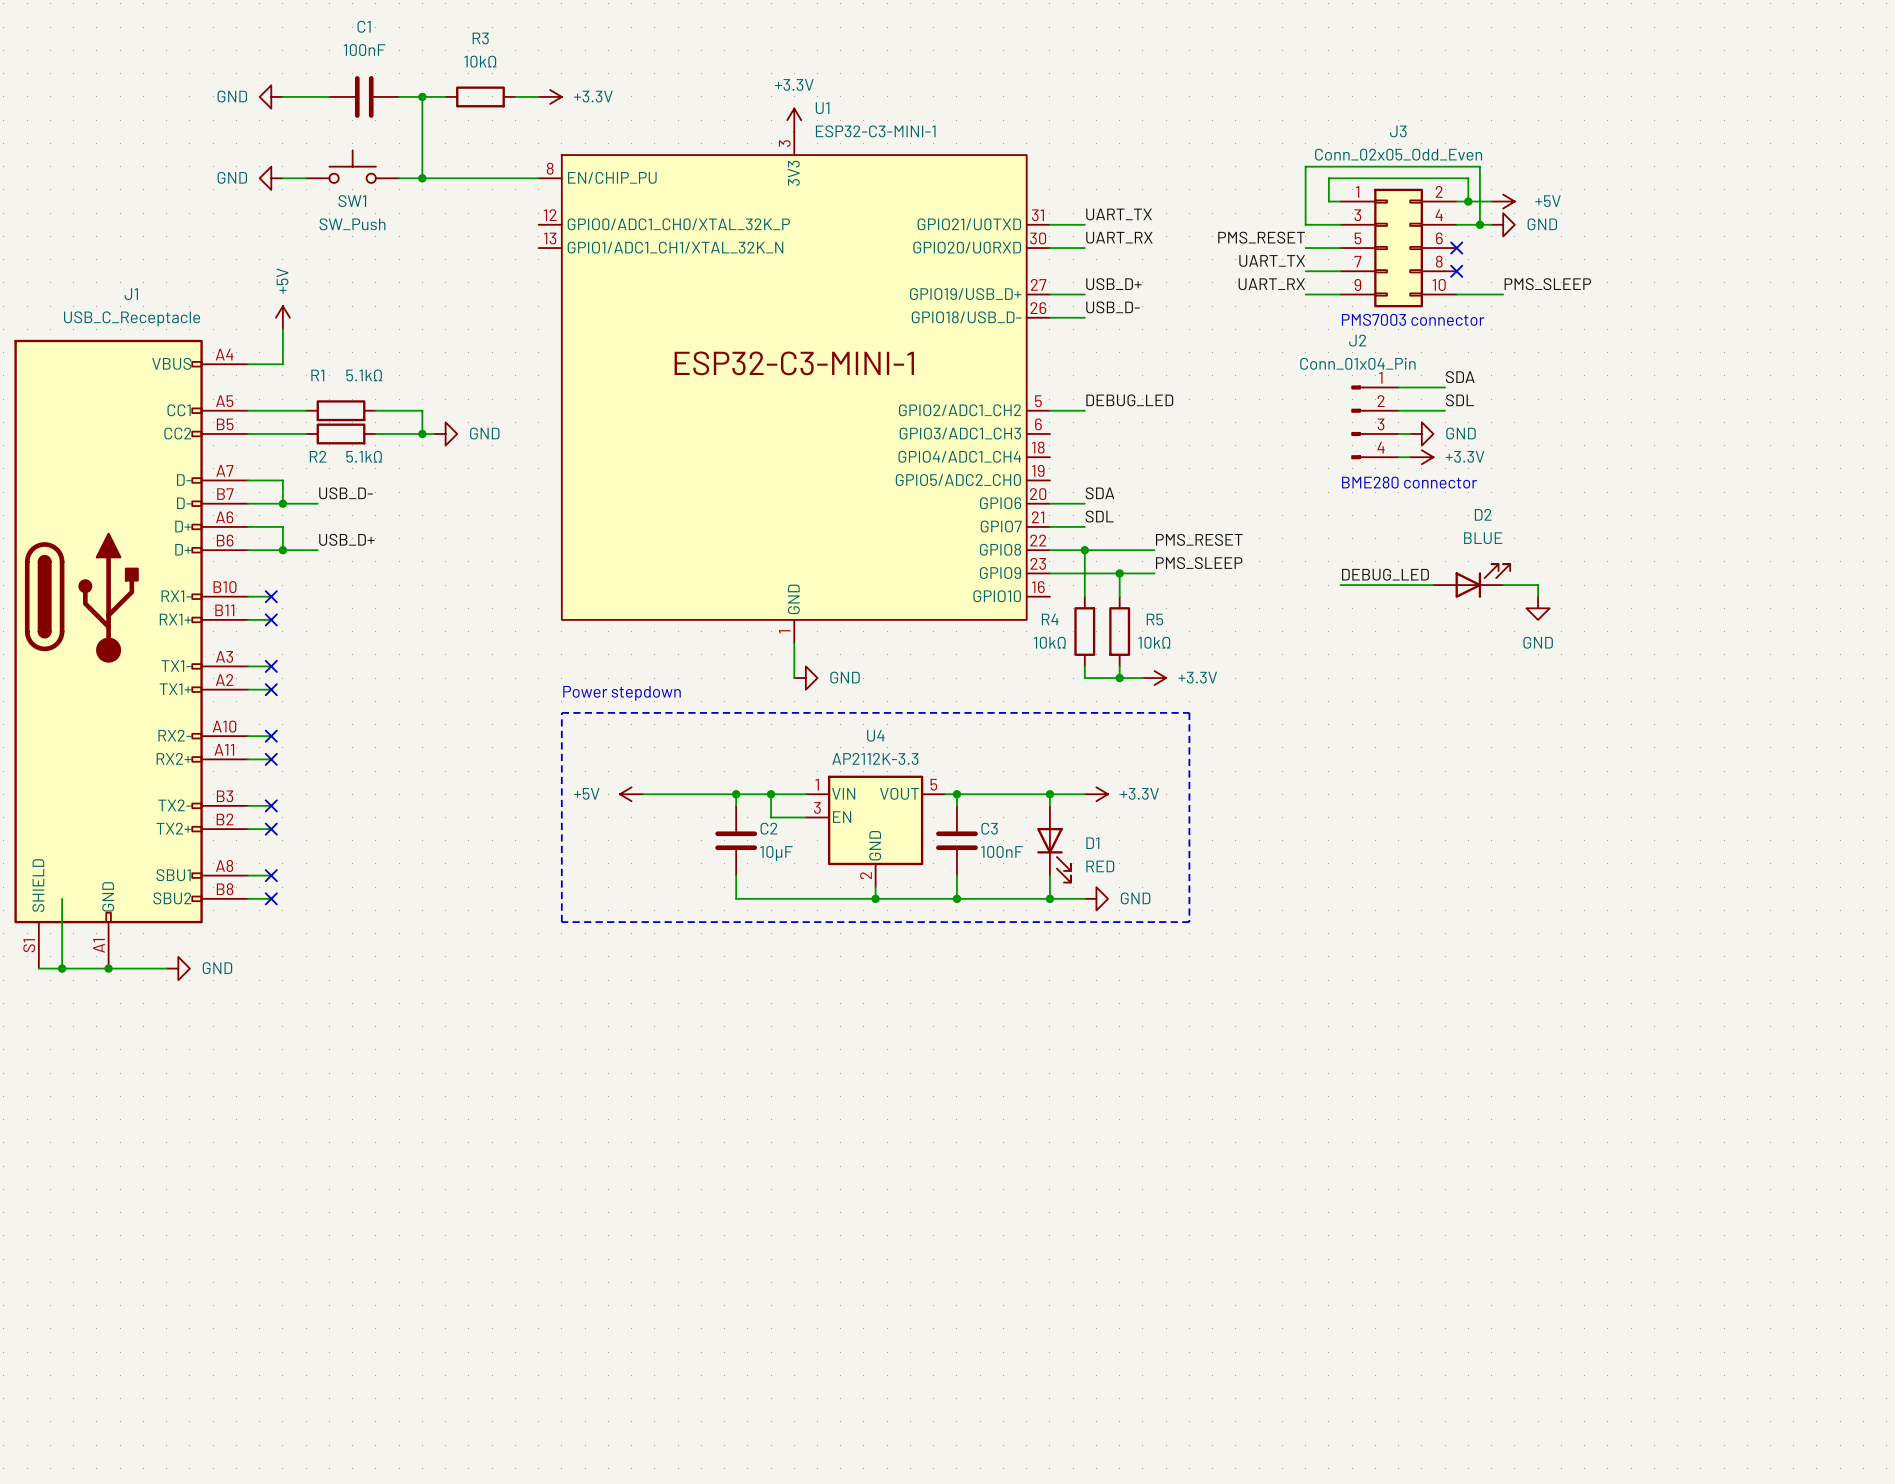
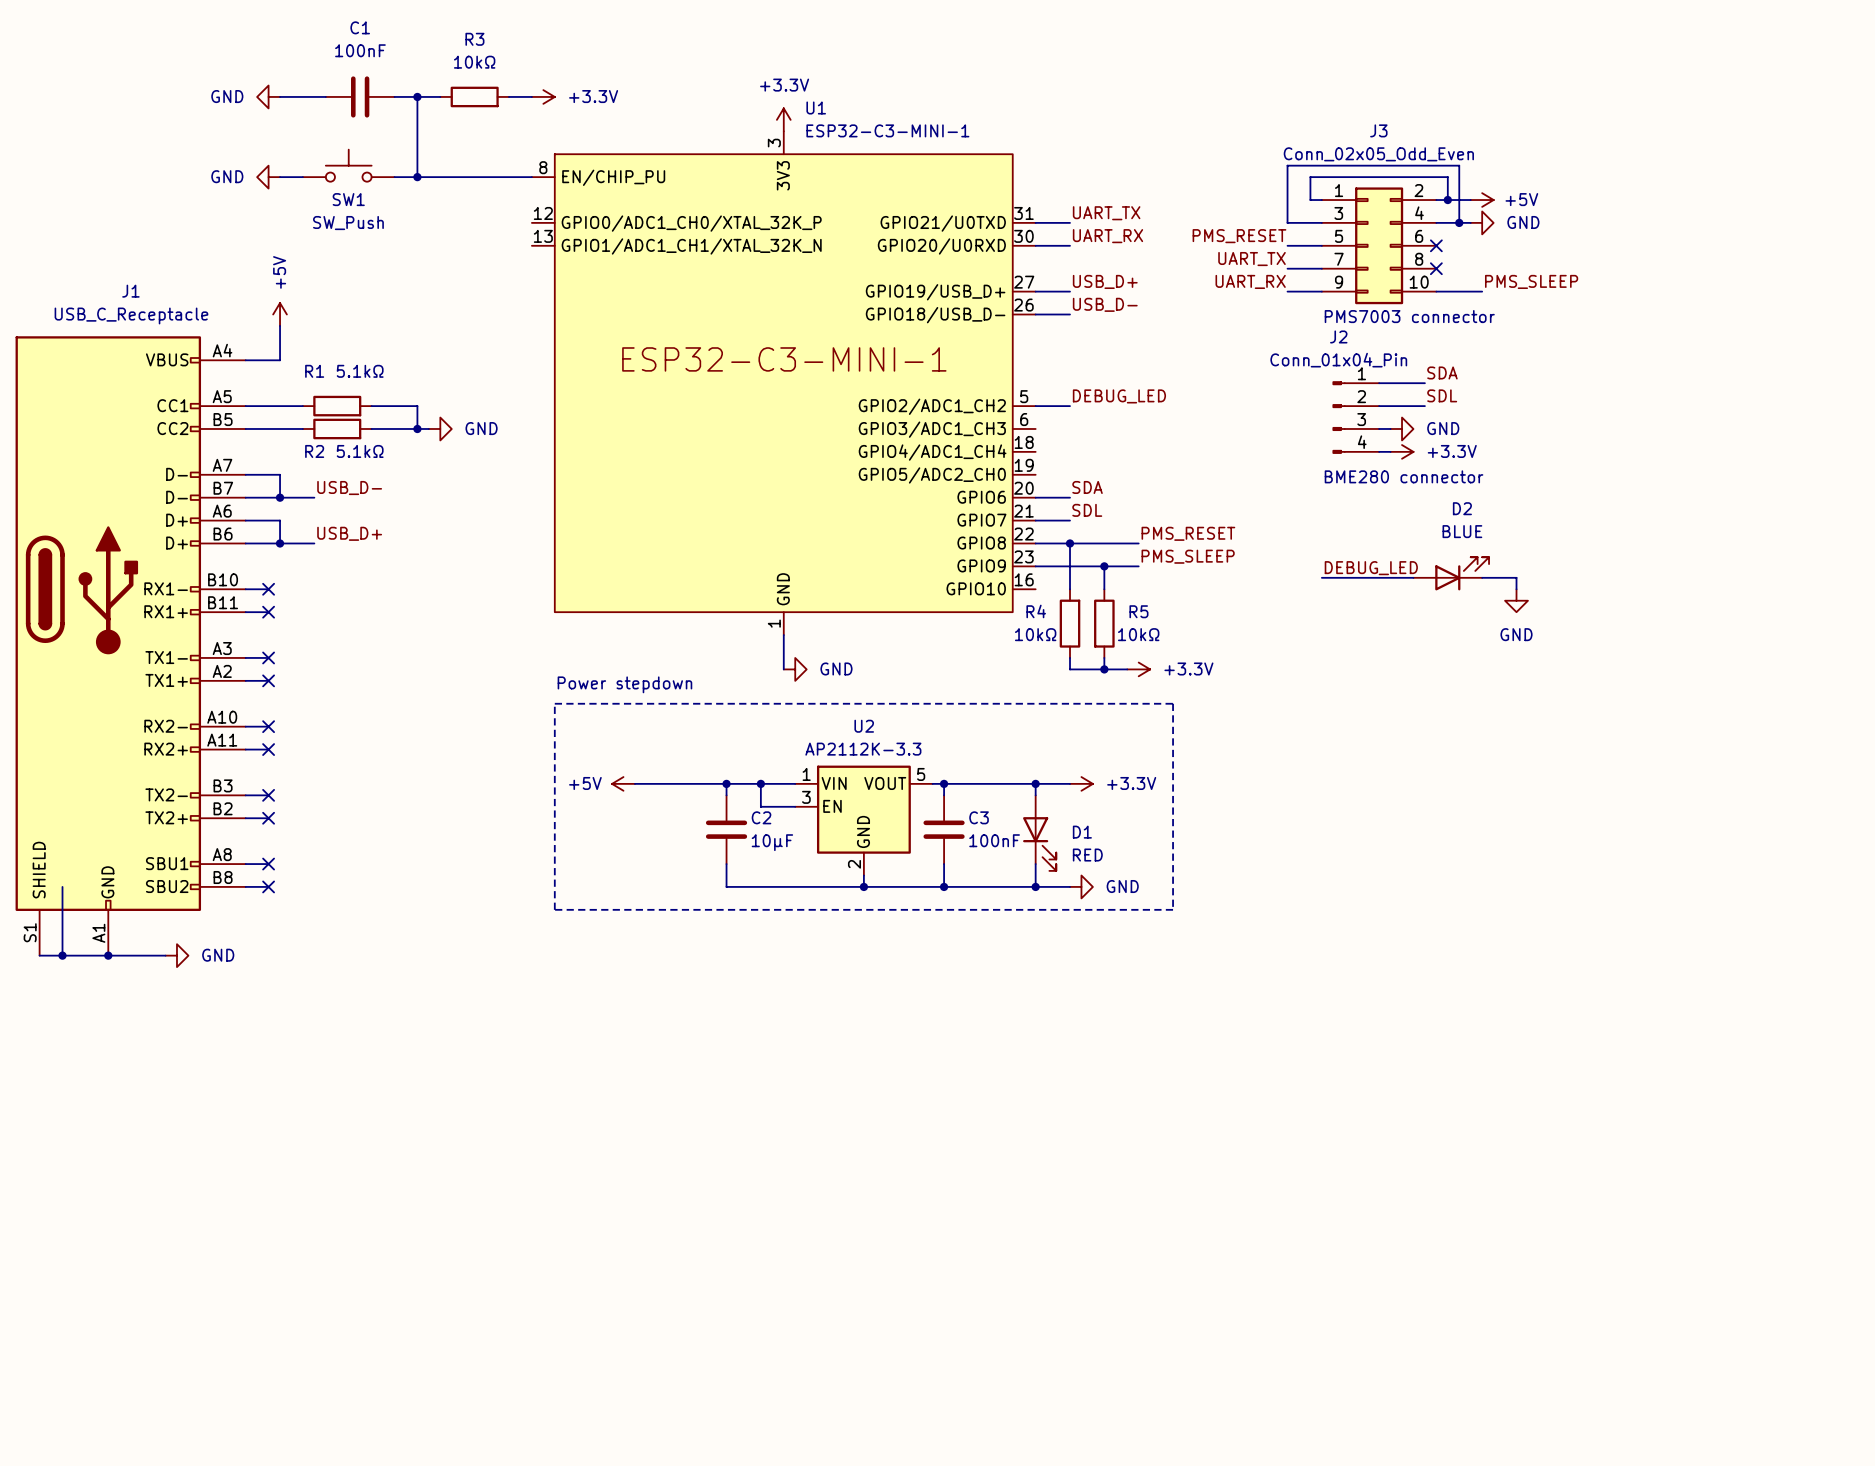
U4 name: U4 (875, 735) -> U2 (864, 726)

